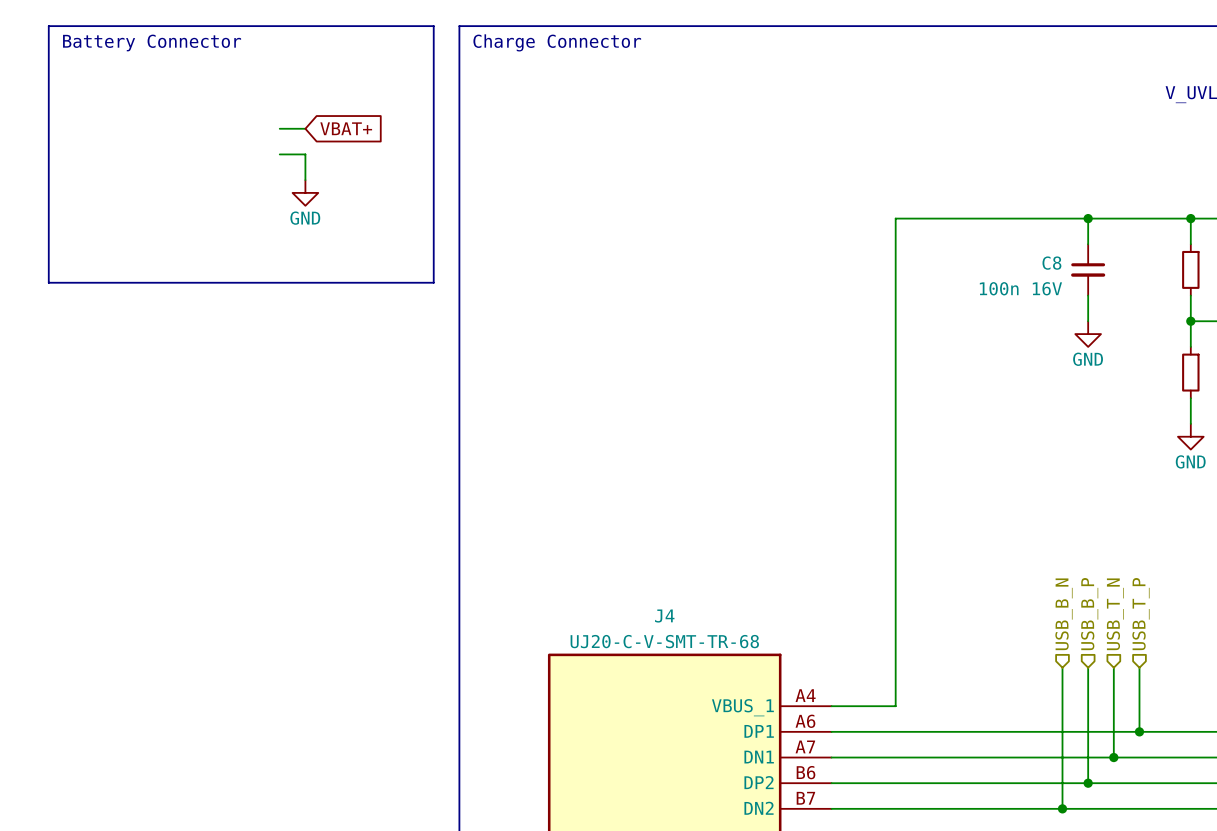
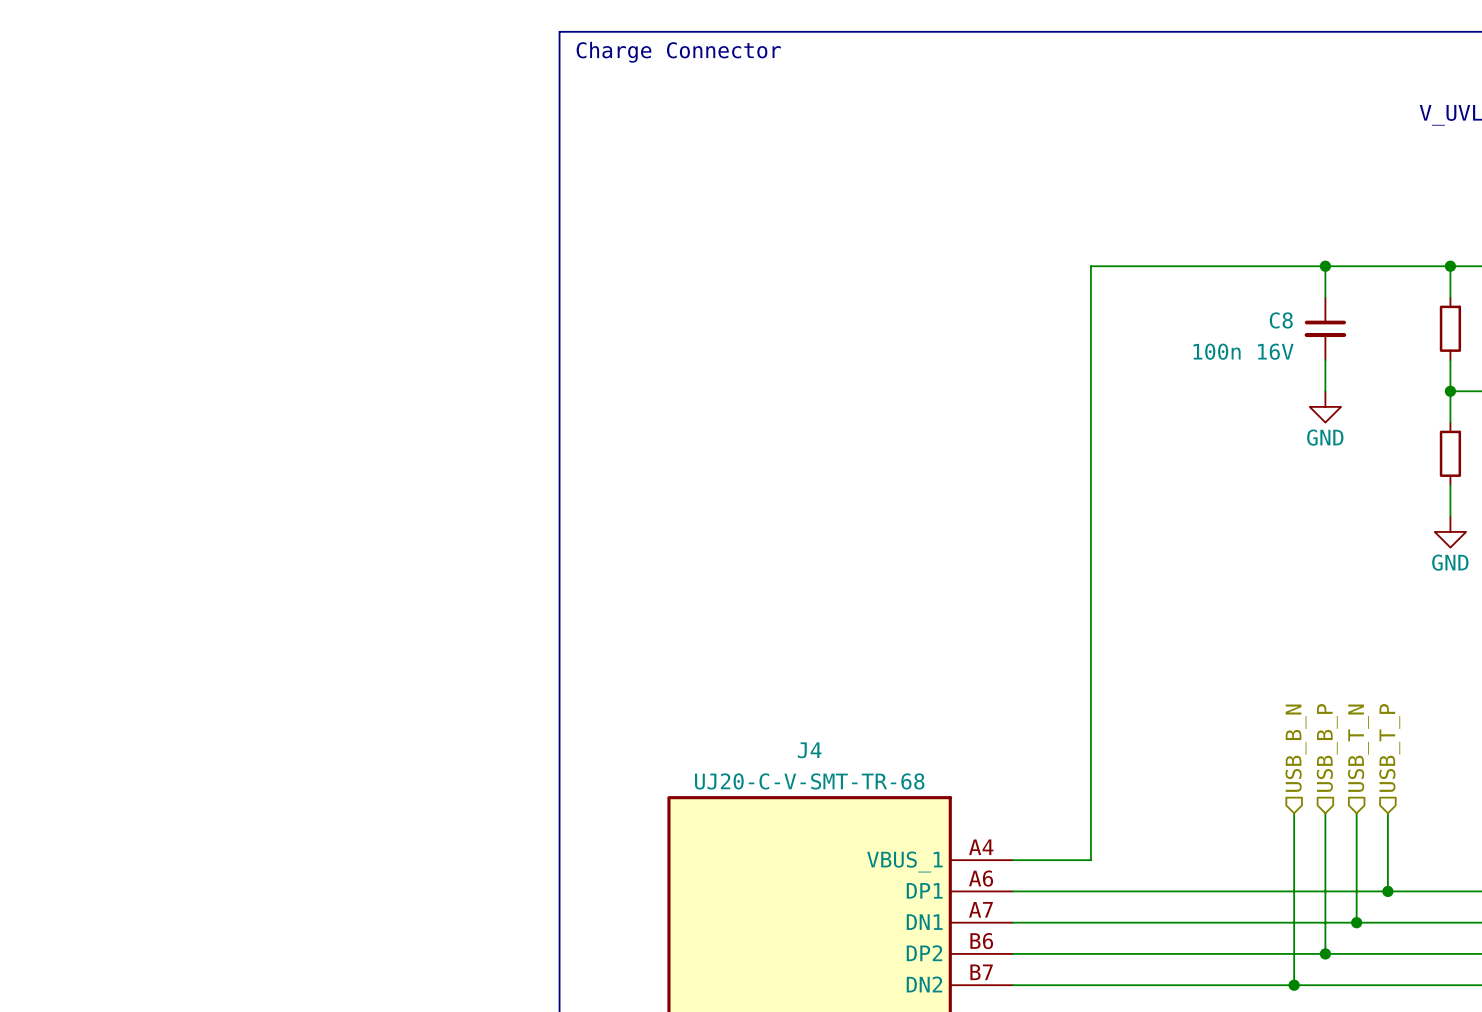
line: (48, 26) (433, 26) (433, 282) (48, 282) (48, 26) -> none
text: Battery Connector (152, 42) -> none
wire: (279, 128) (305, 128) -> none
global label: VBAT+ (346, 128) -> none
wire: (279, 154) (305, 154) (305, 180) -> none
power symbol: GND (305, 192) -> none

